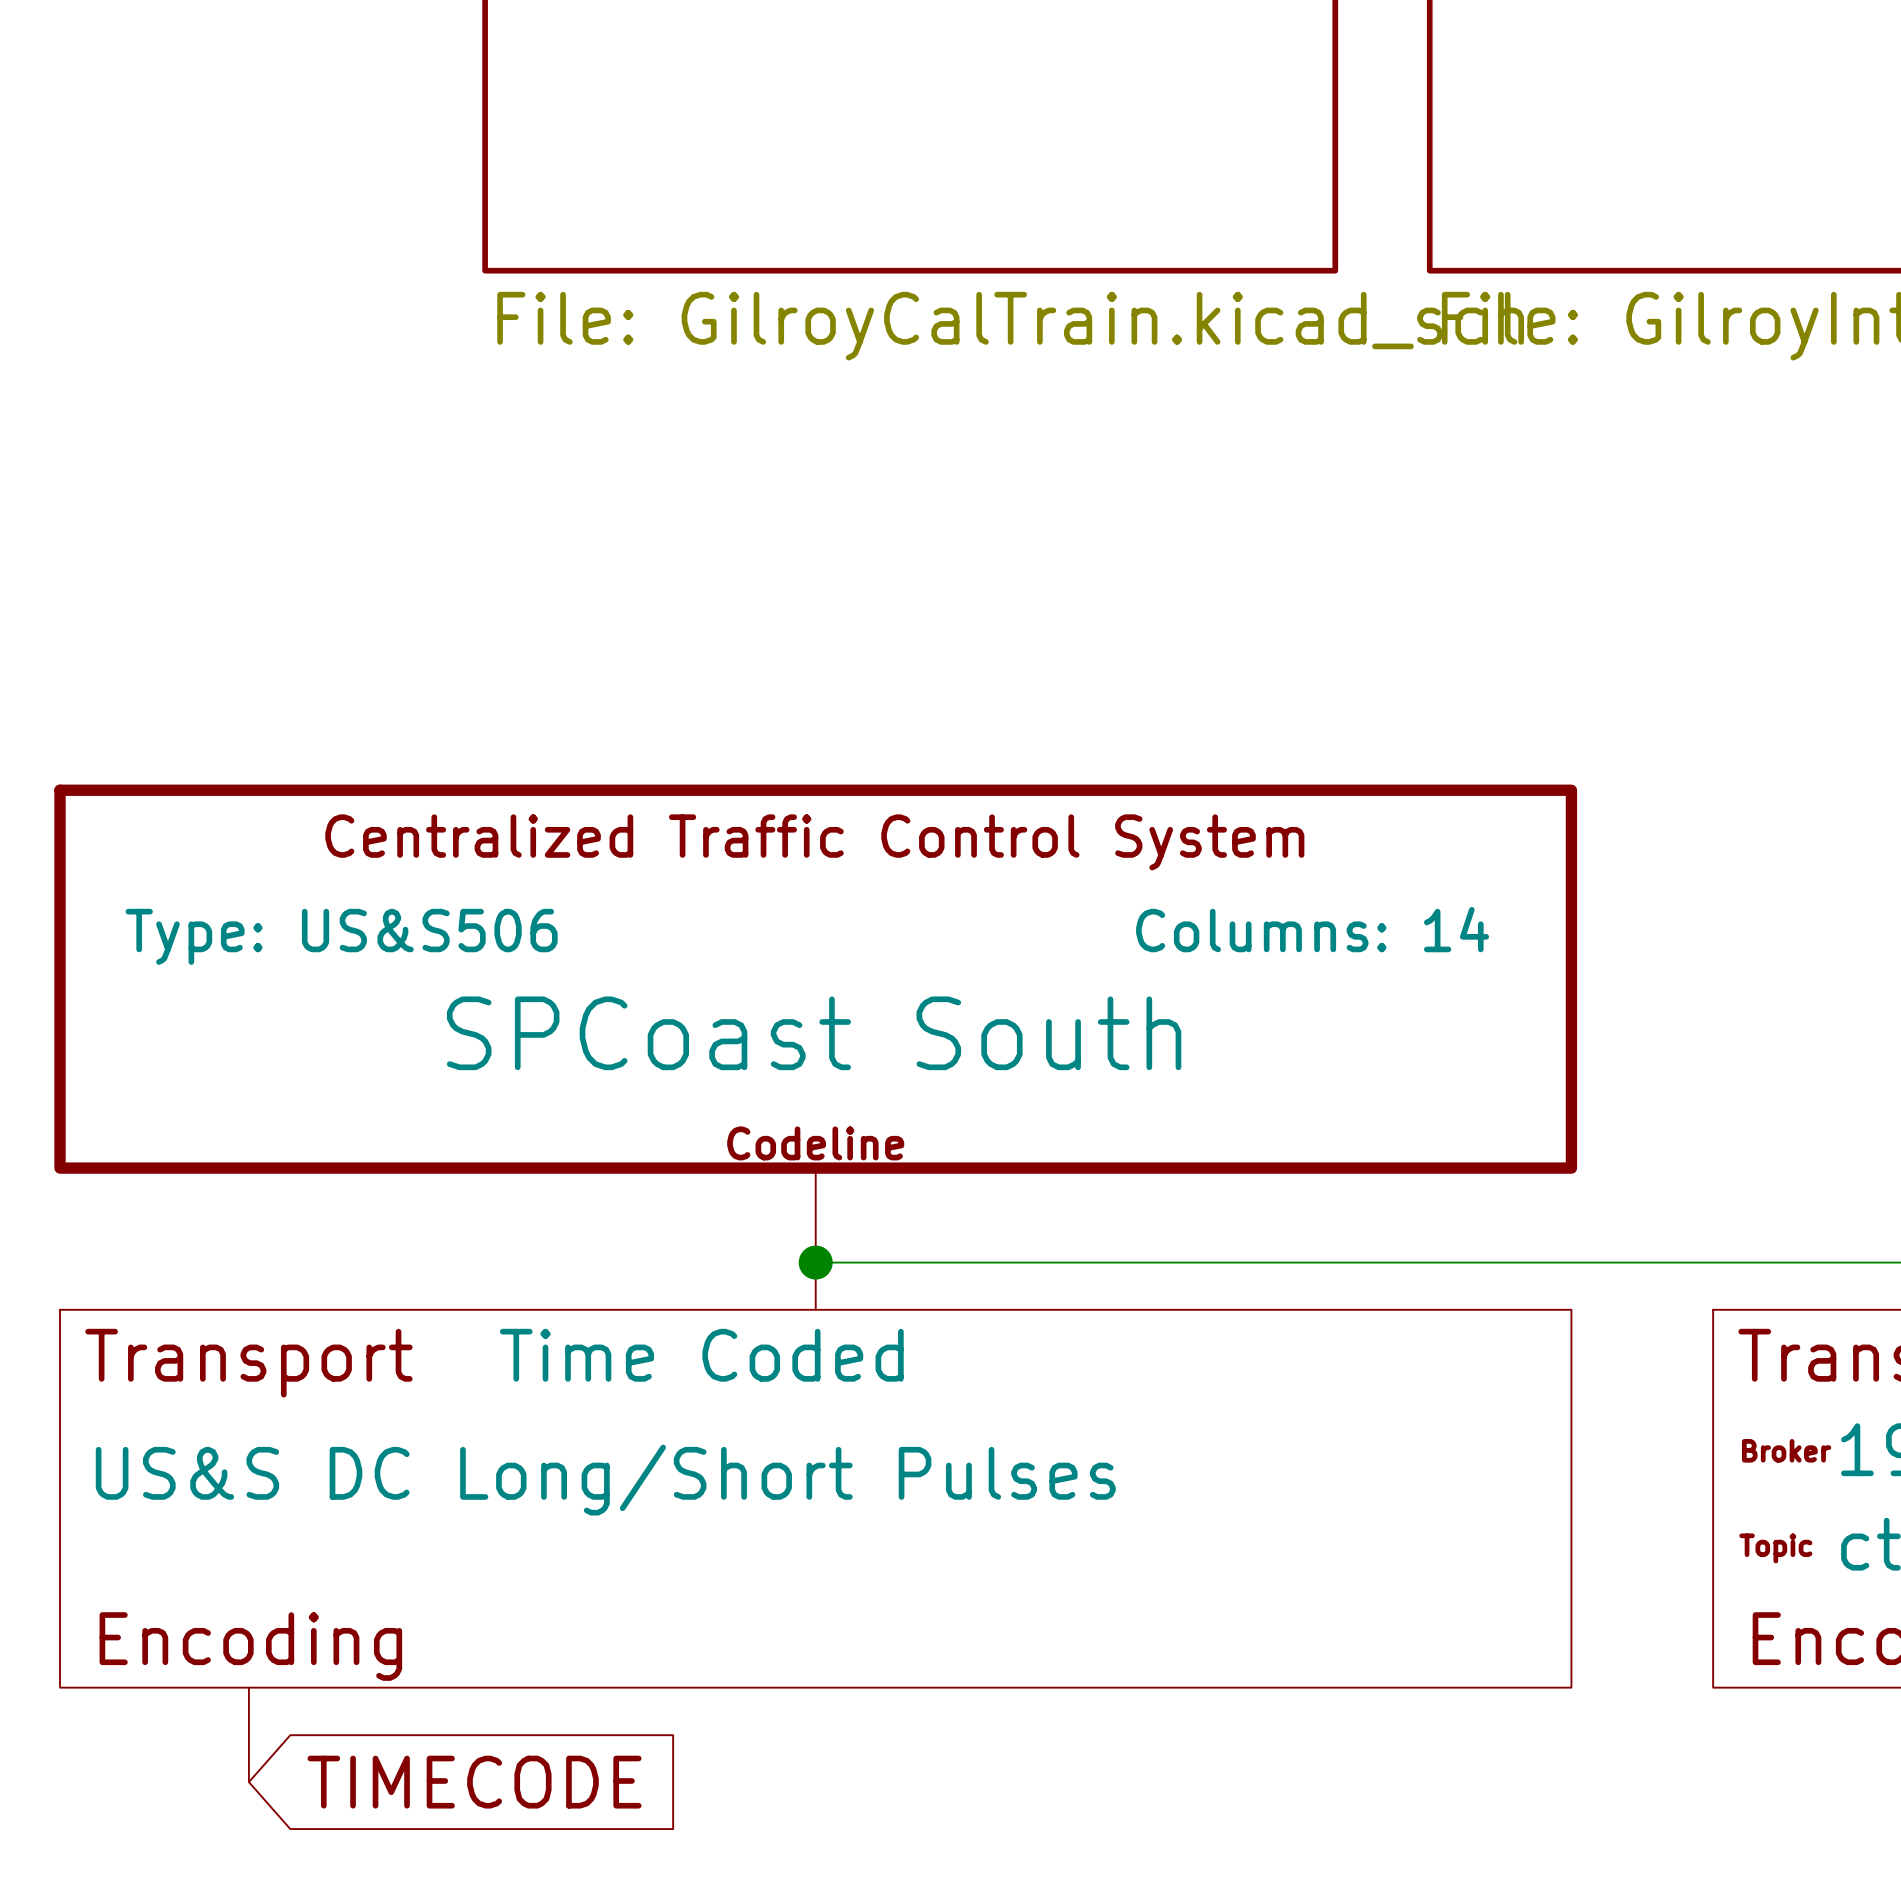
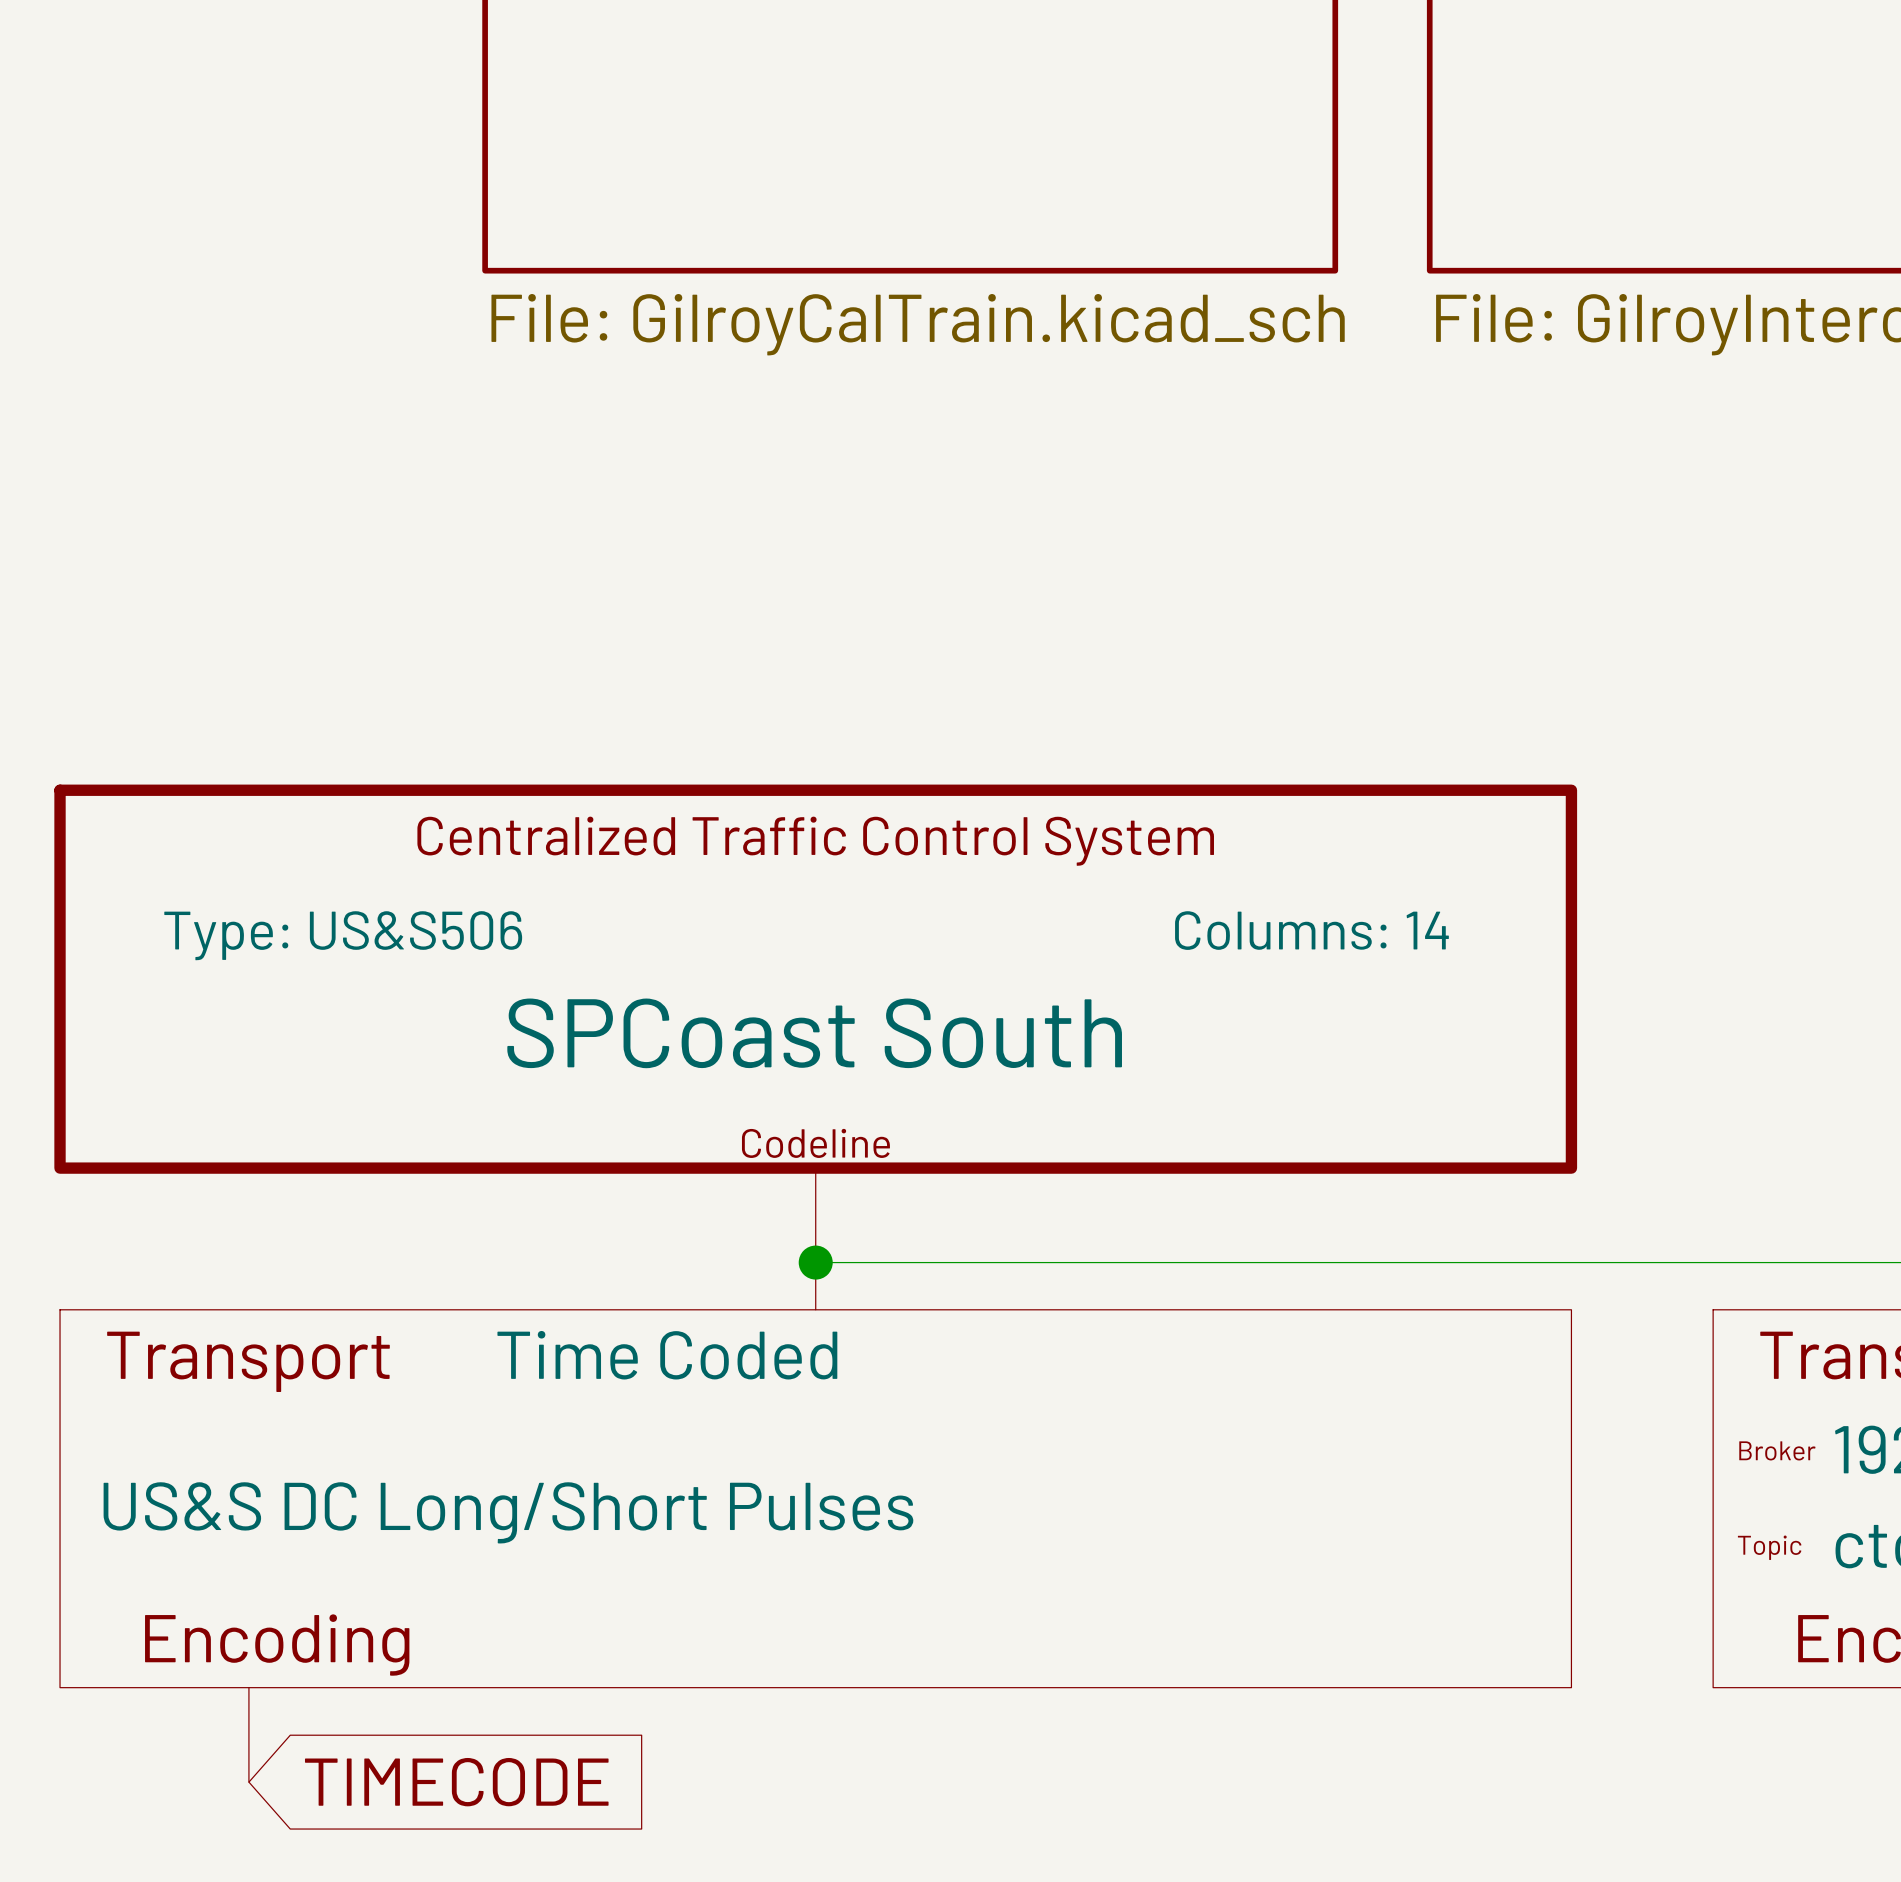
part text position: US&S DC Long/Short Pulses (605, 1480) -> US&S DC Long/Short Pulses (508, 1512)

